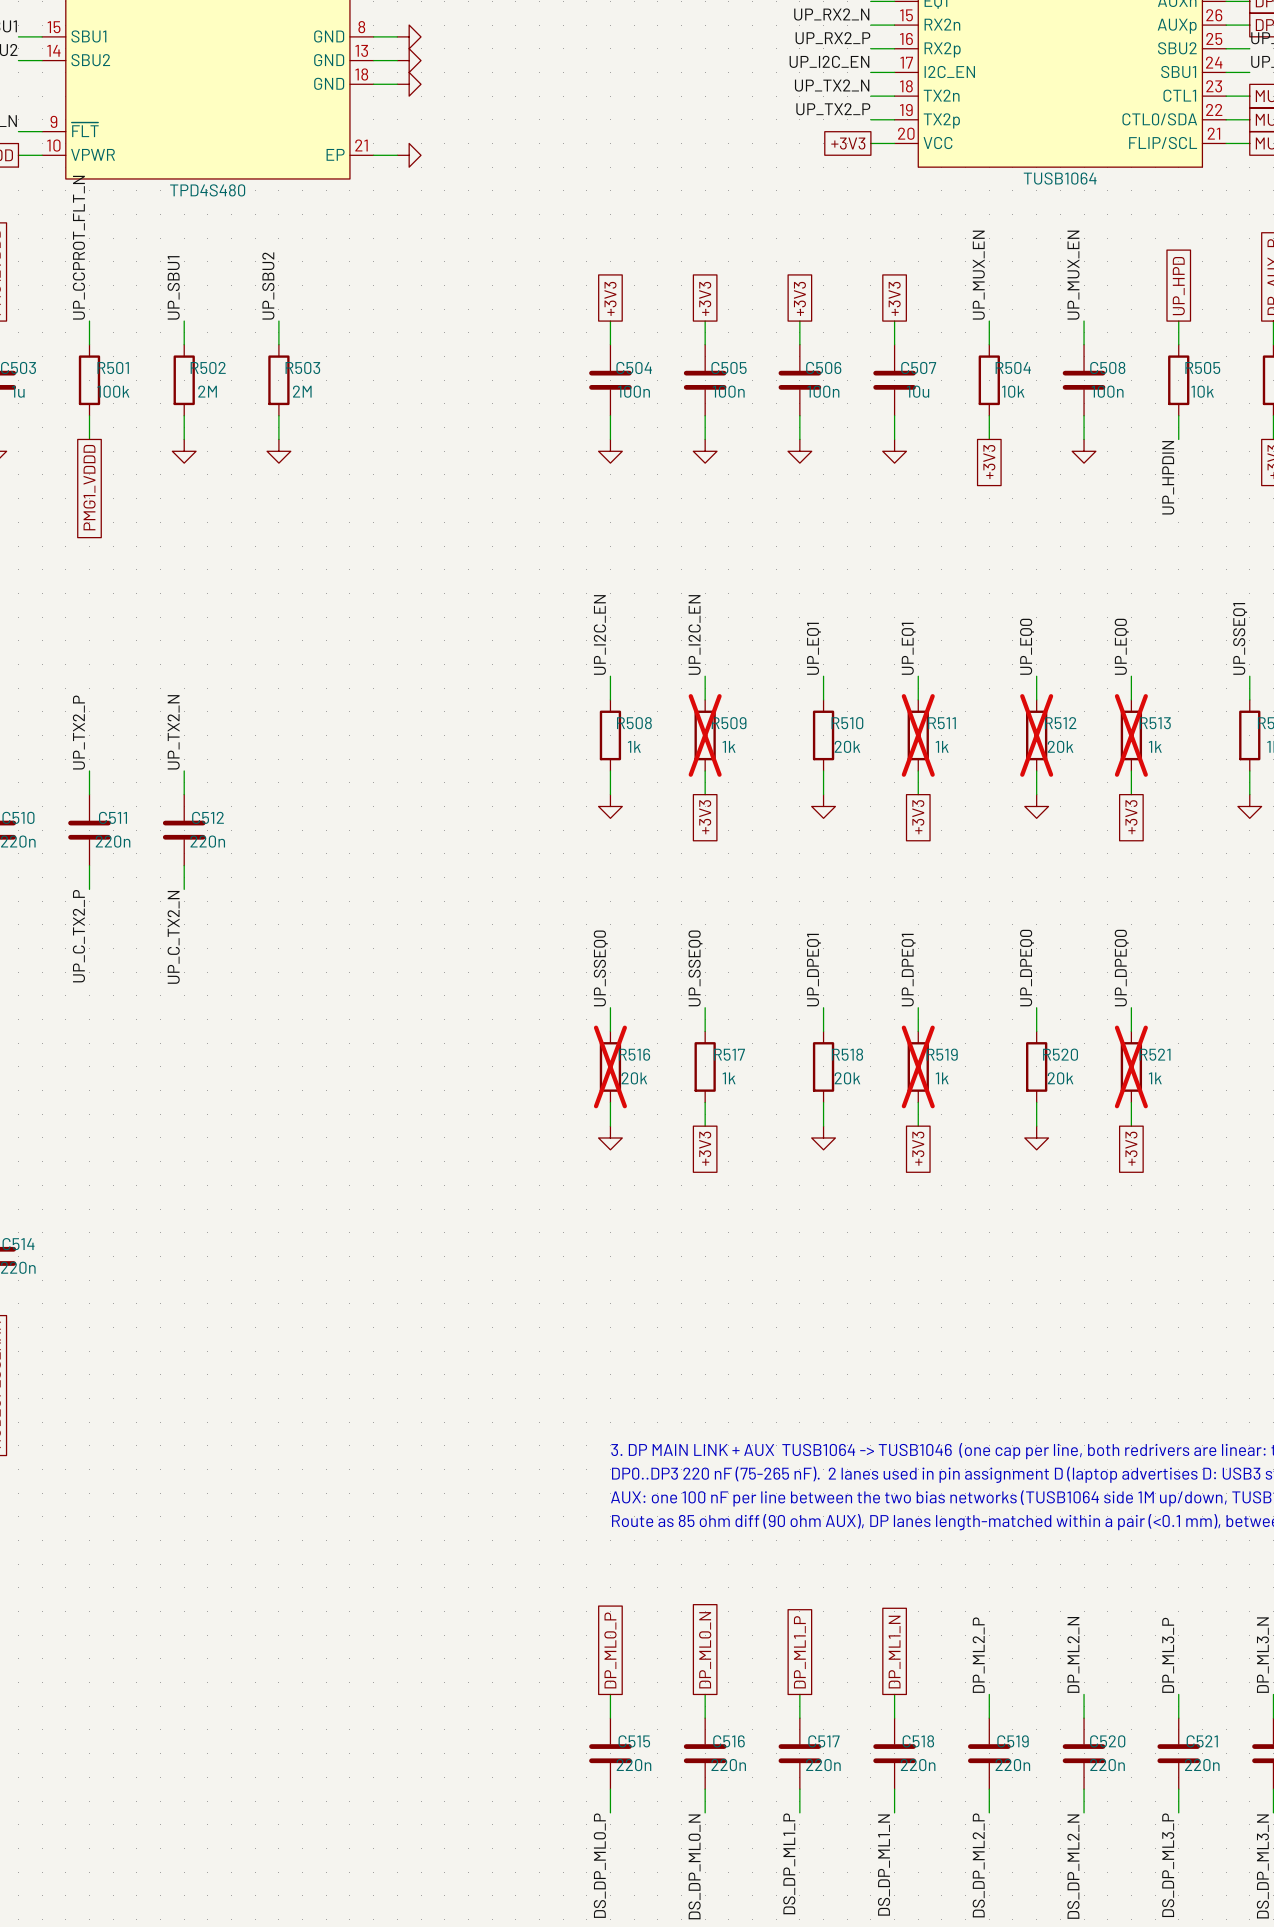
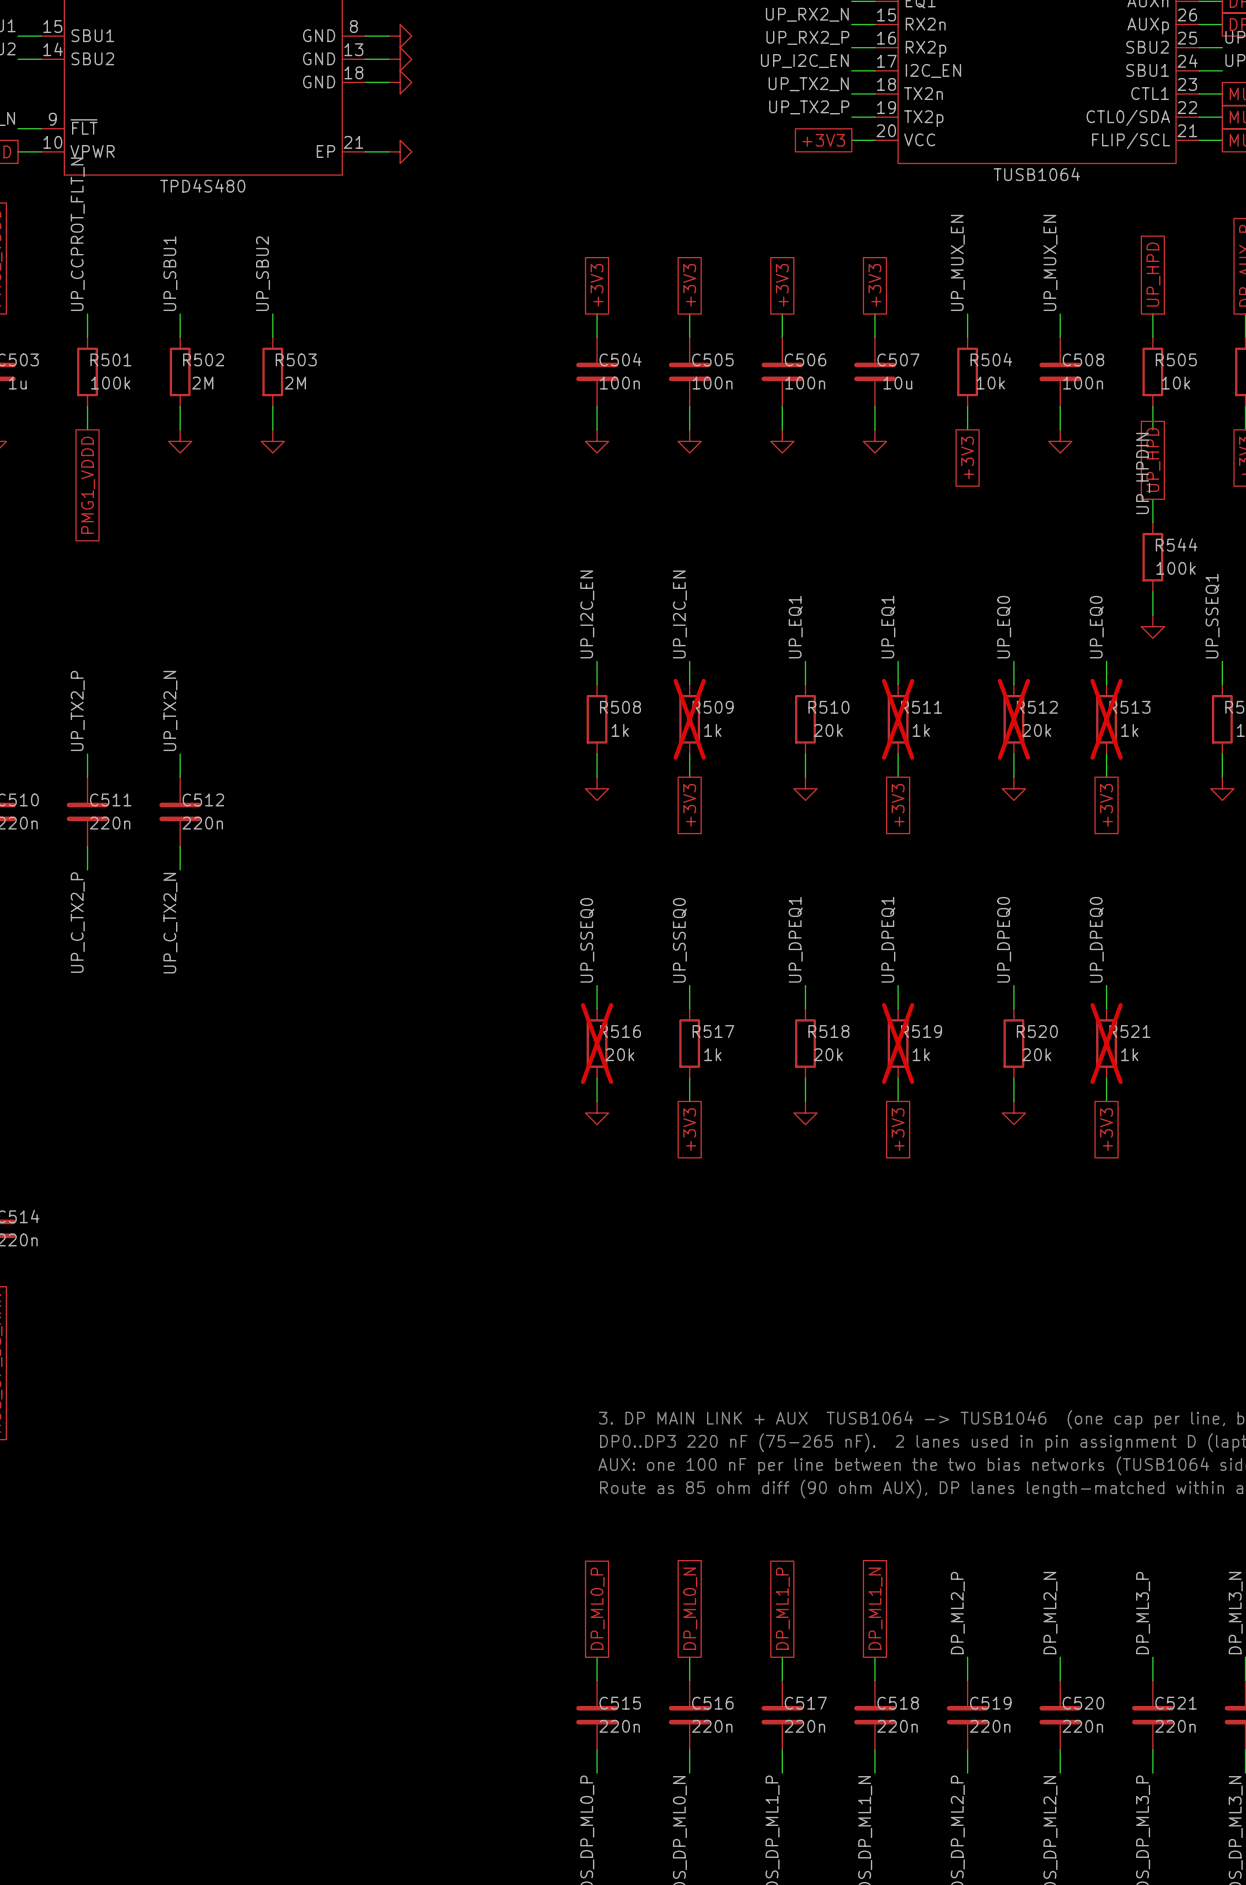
global label: none -> UP_HPD (1153, 459)
wire: none -> (1152, 499) (1152, 522)
R544: none -> 100k (1152, 557)
wire: none -> (1152, 591) (1152, 615)
power symbol: none -> (1152, 626)

